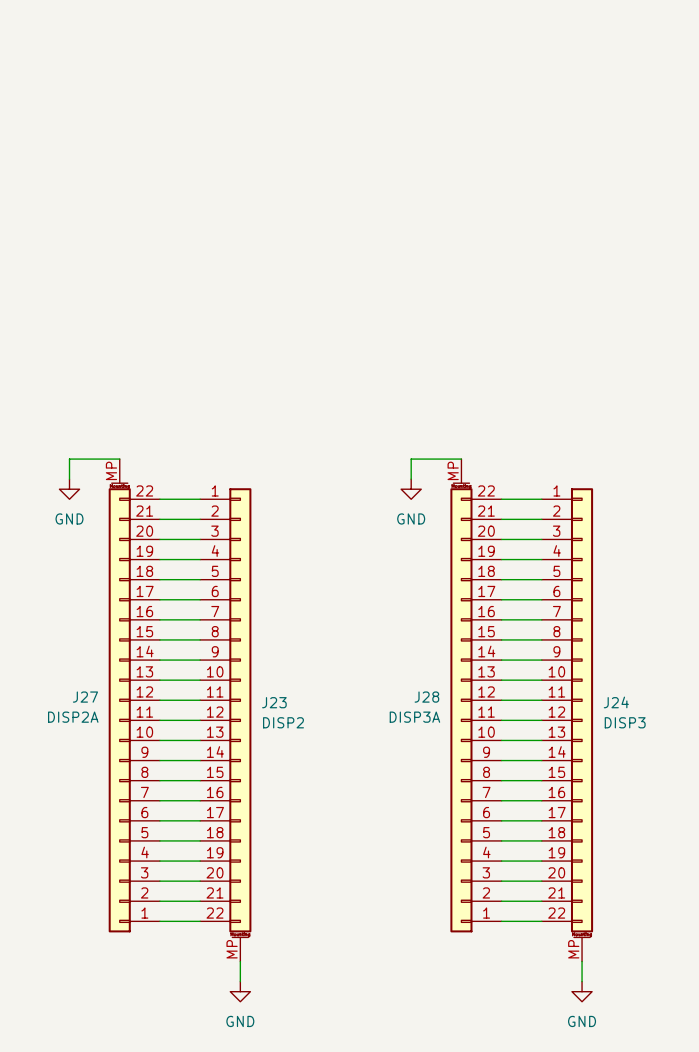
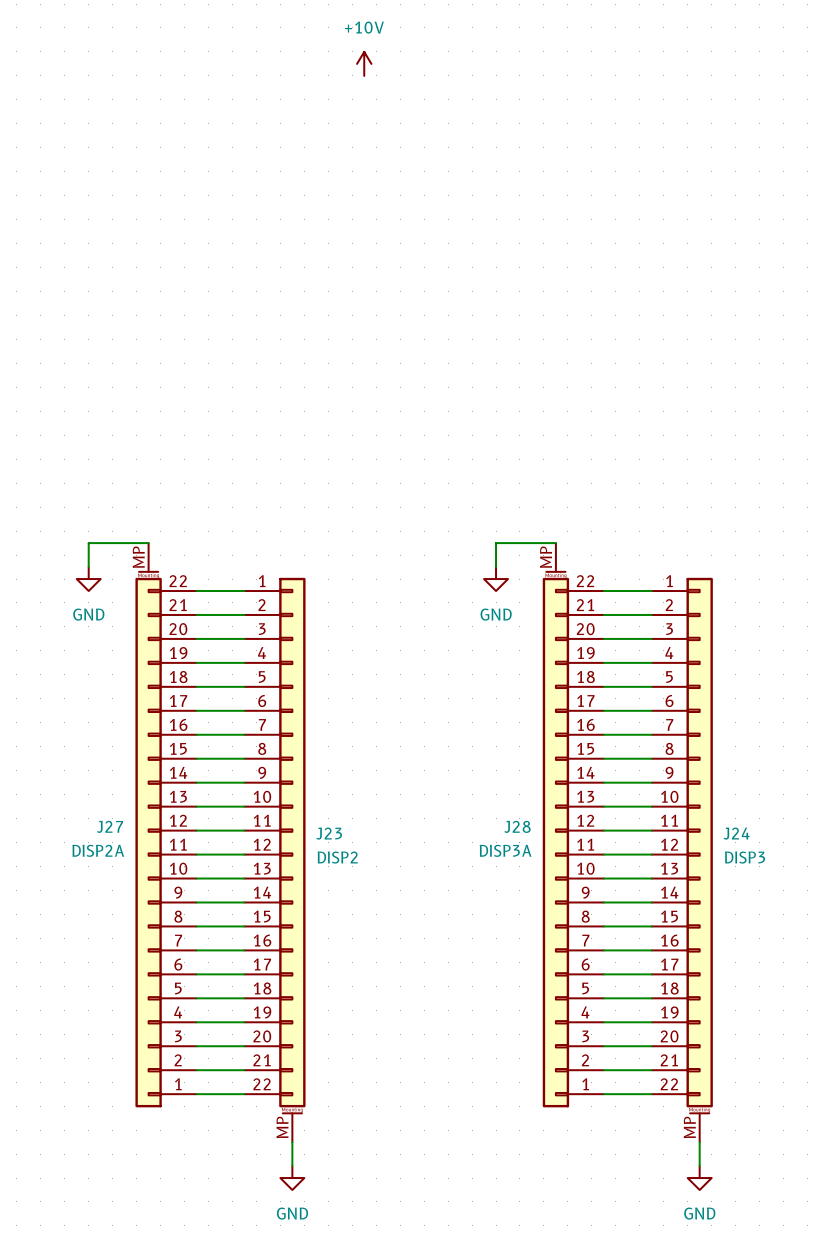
power symbol: none -> +10V (364, 63)

